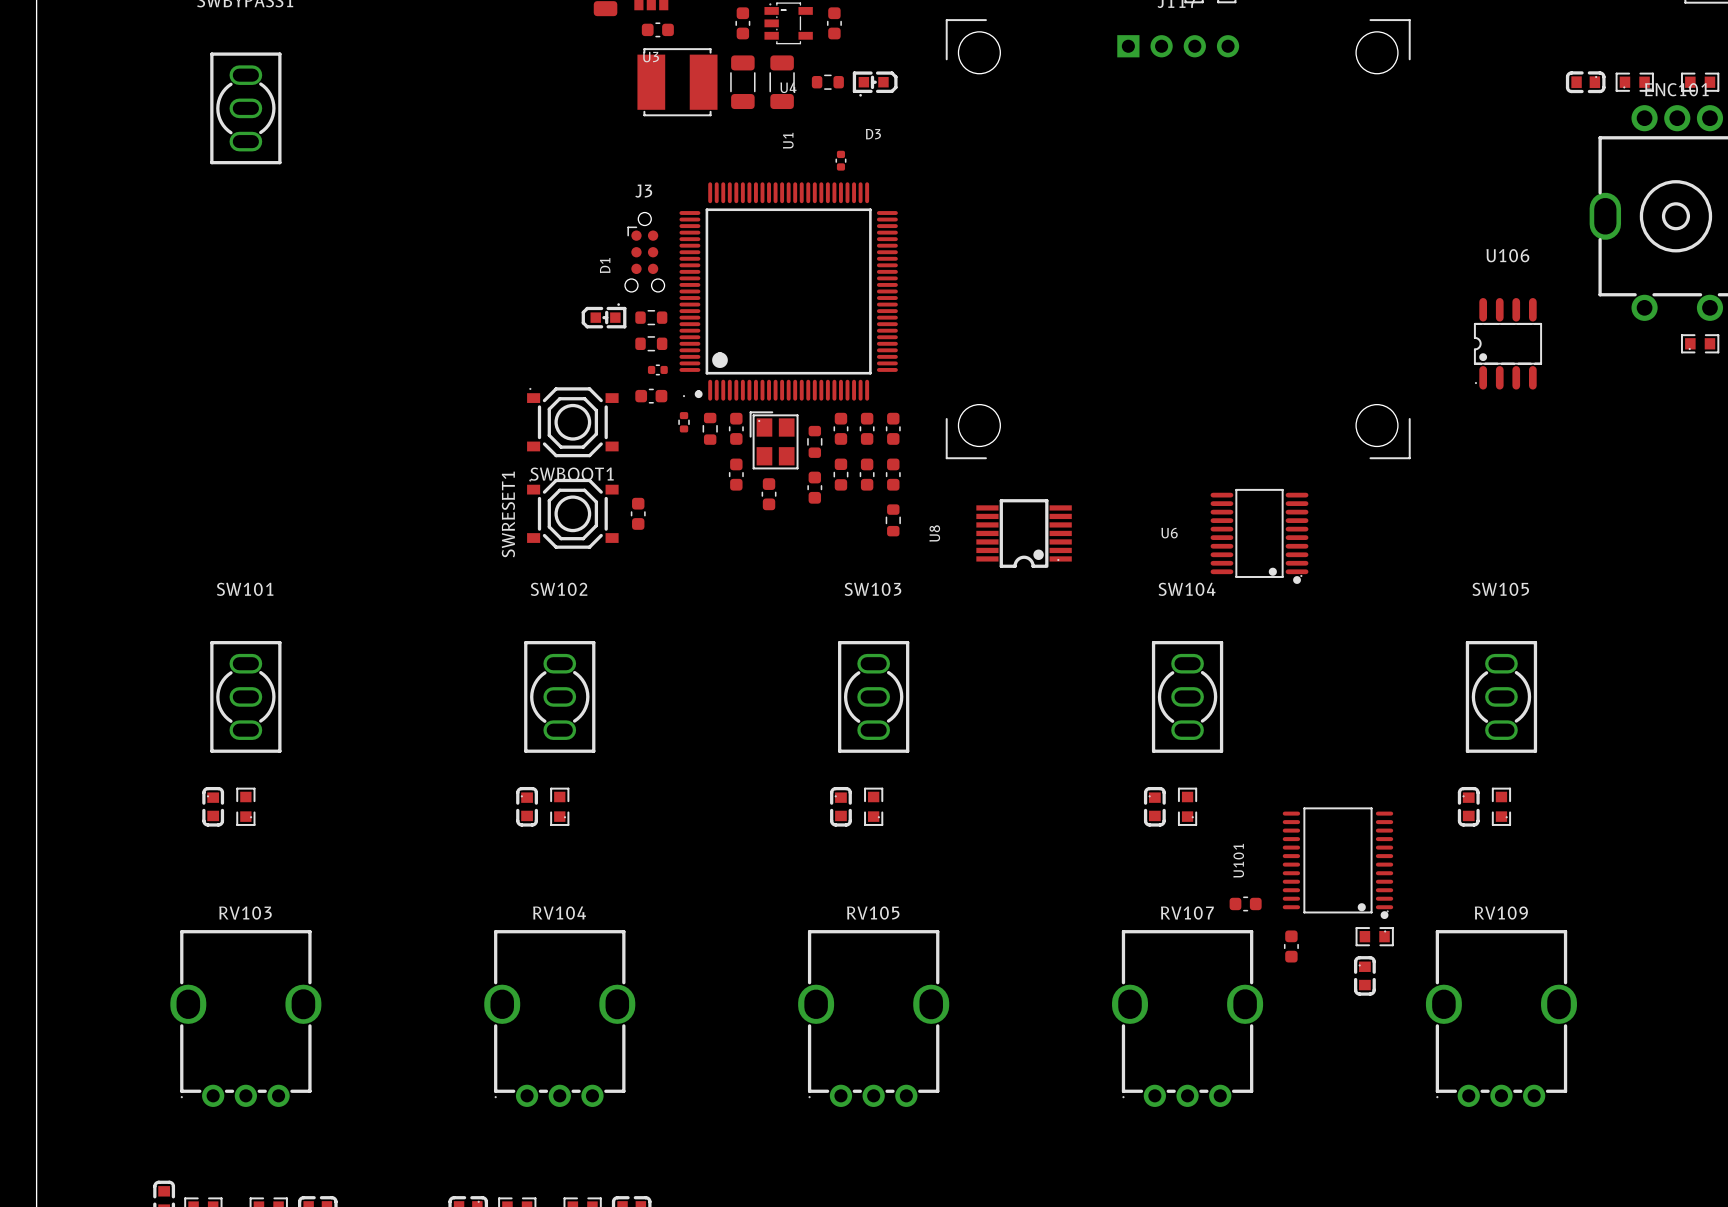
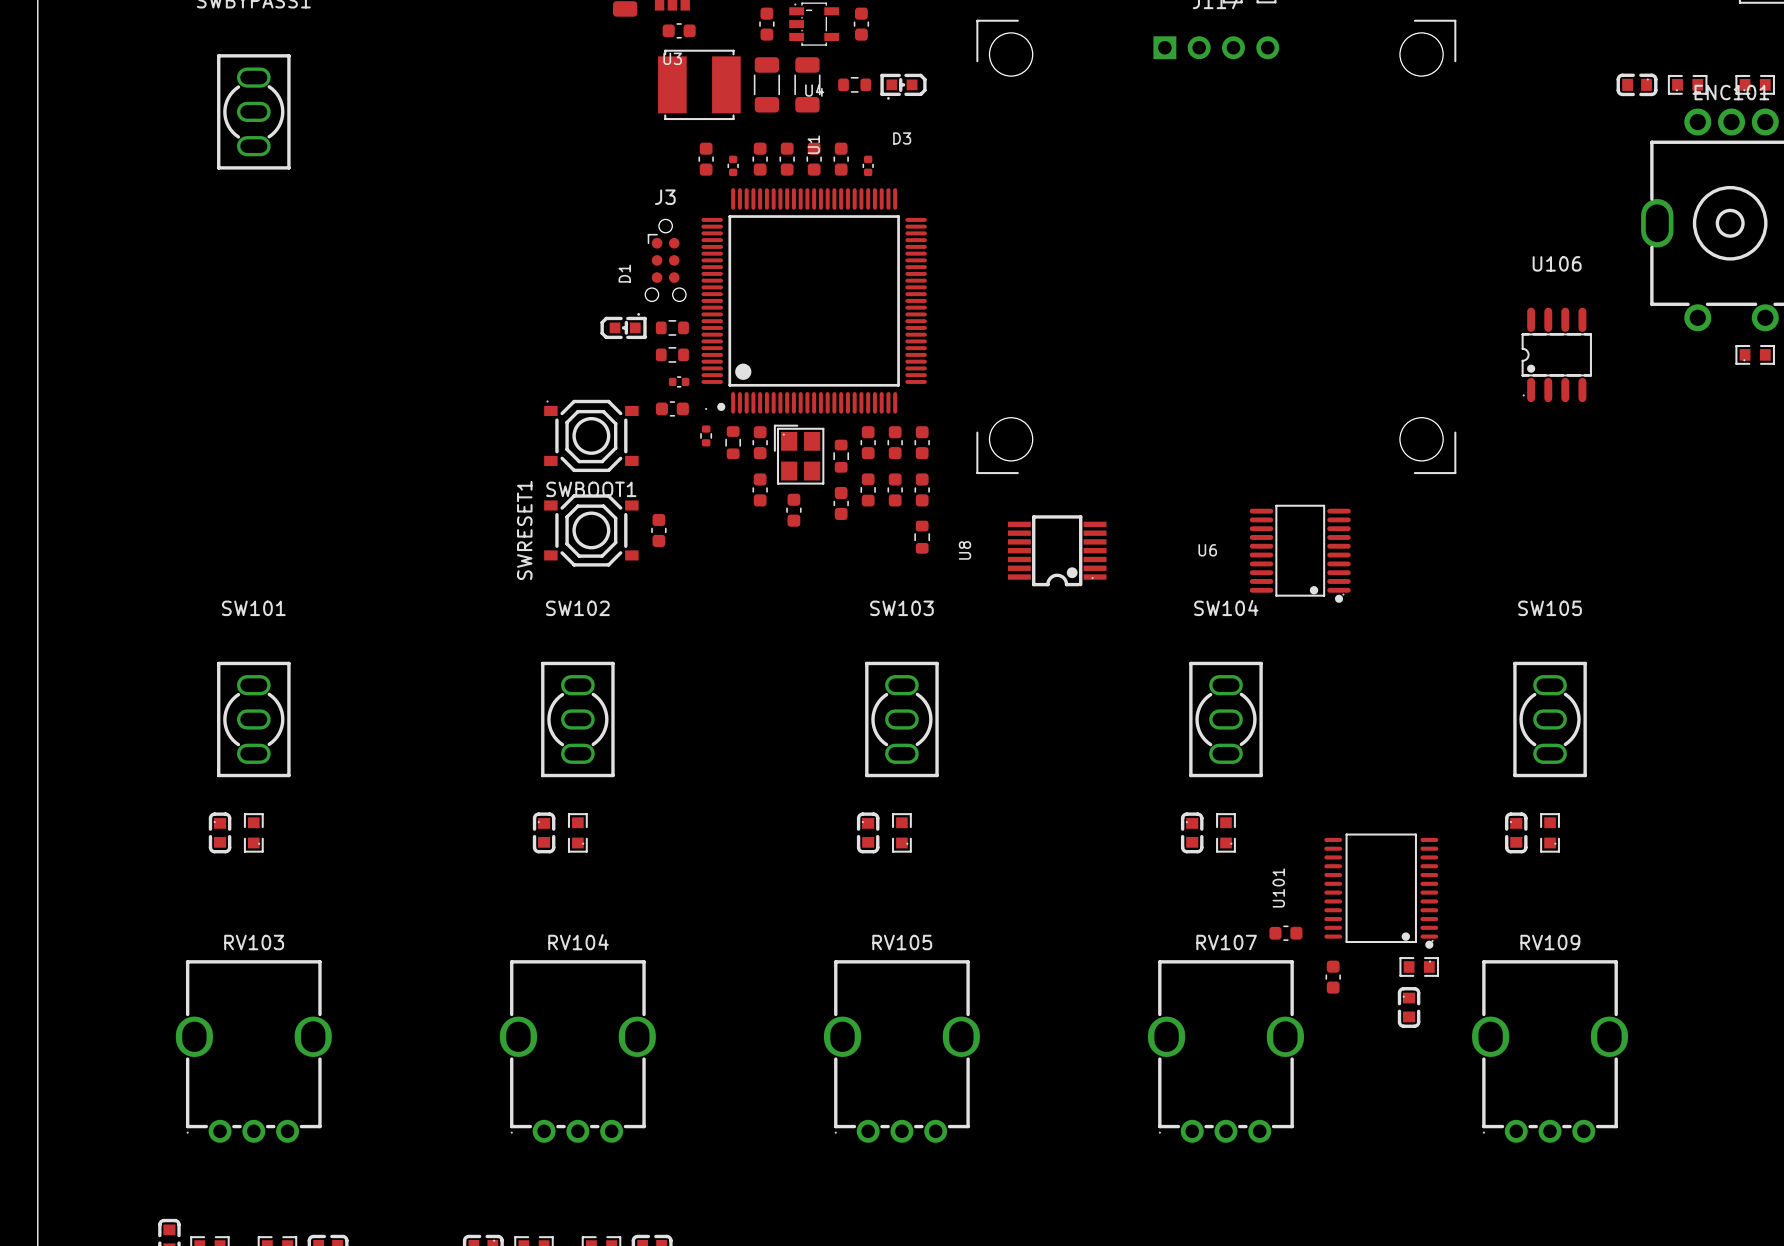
part: none -> (706, 159)
part: none -> (760, 159)
part: none -> (787, 159)
part: none -> (814, 159)
part: none -> (841, 159)
part: none -> (733, 165)

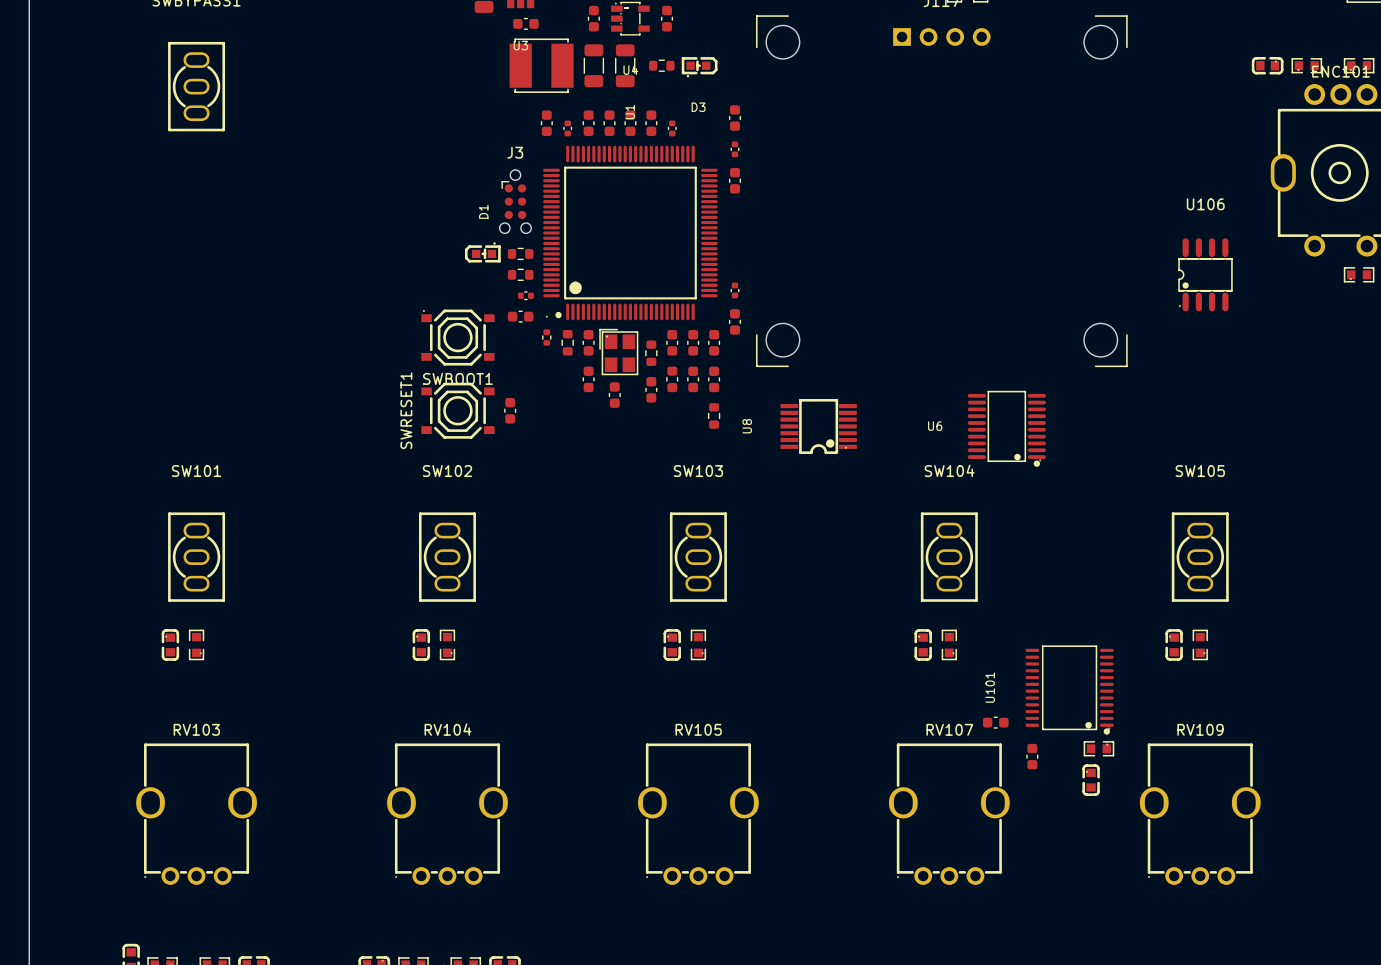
part: none -> (735, 118)
part: none -> (735, 149)
part: none -> (735, 180)
part: none -> (735, 290)
part: none -> (735, 321)

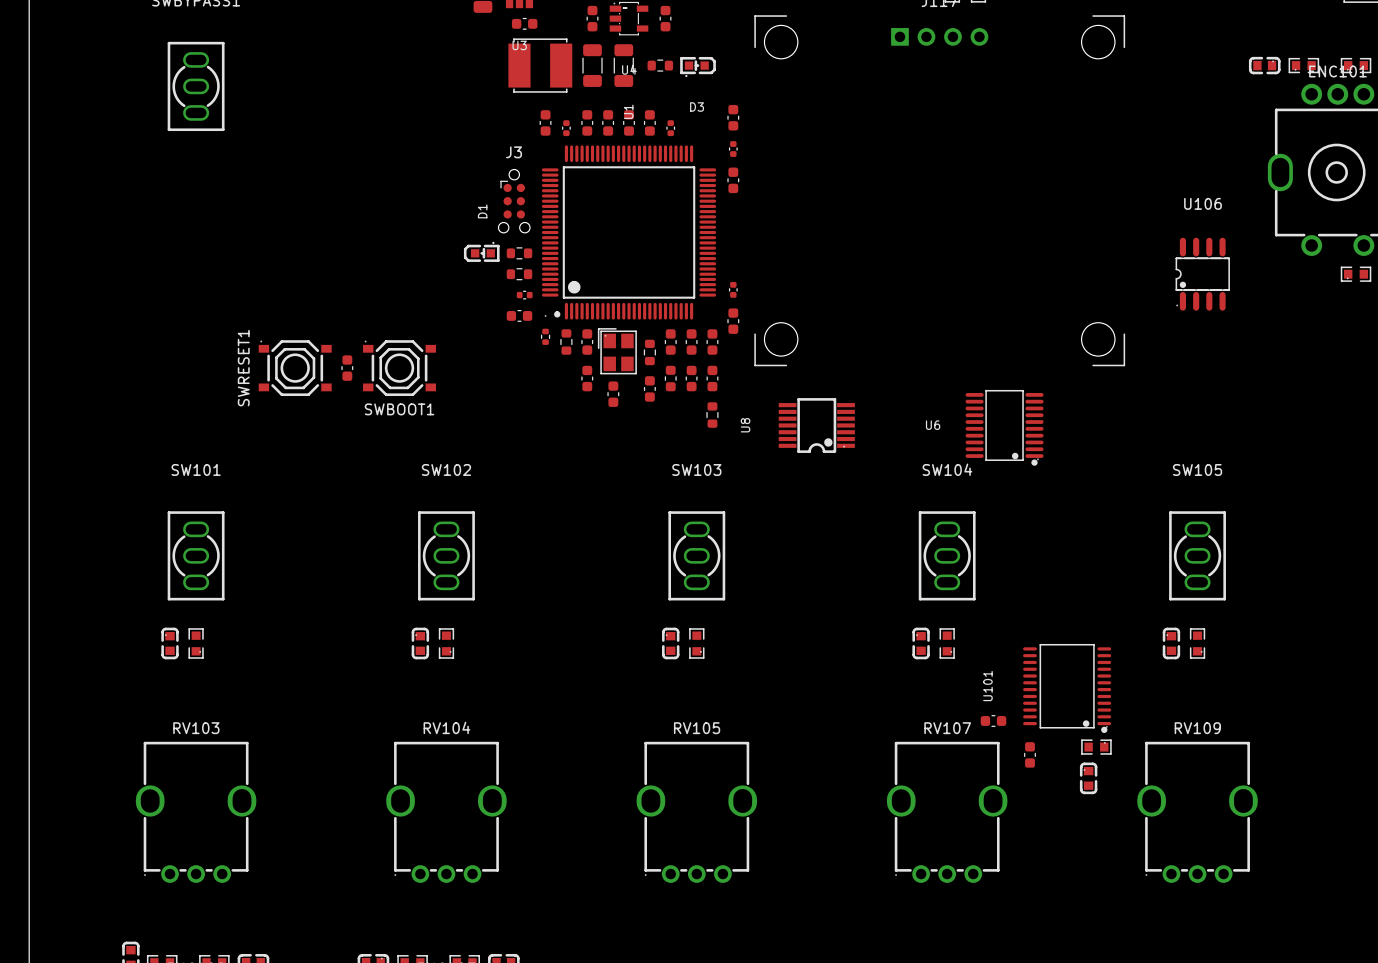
SWBOOT1 position: (457, 337) -> (399, 368)
SWRESET1 position: (457, 410) -> (295, 368)
part position: (510, 410) -> (347, 368)

